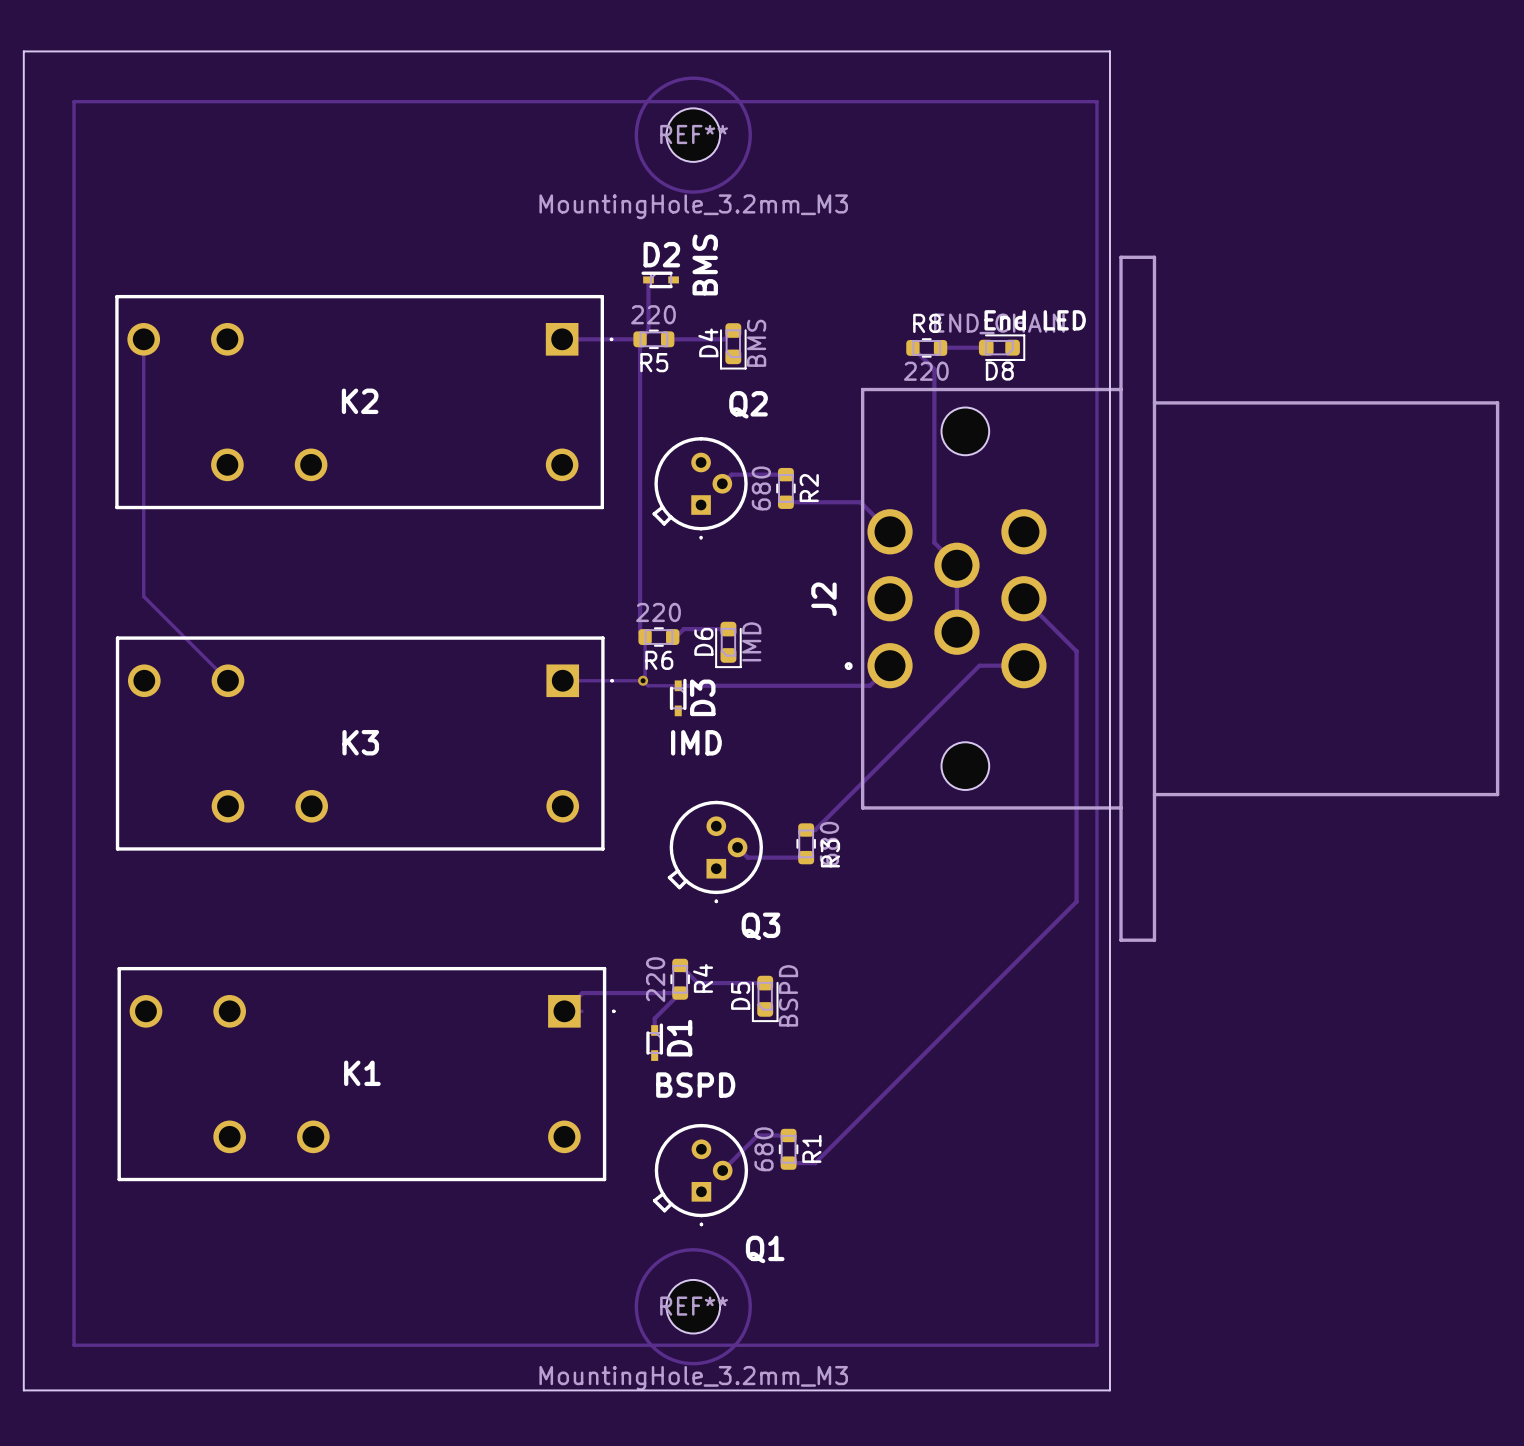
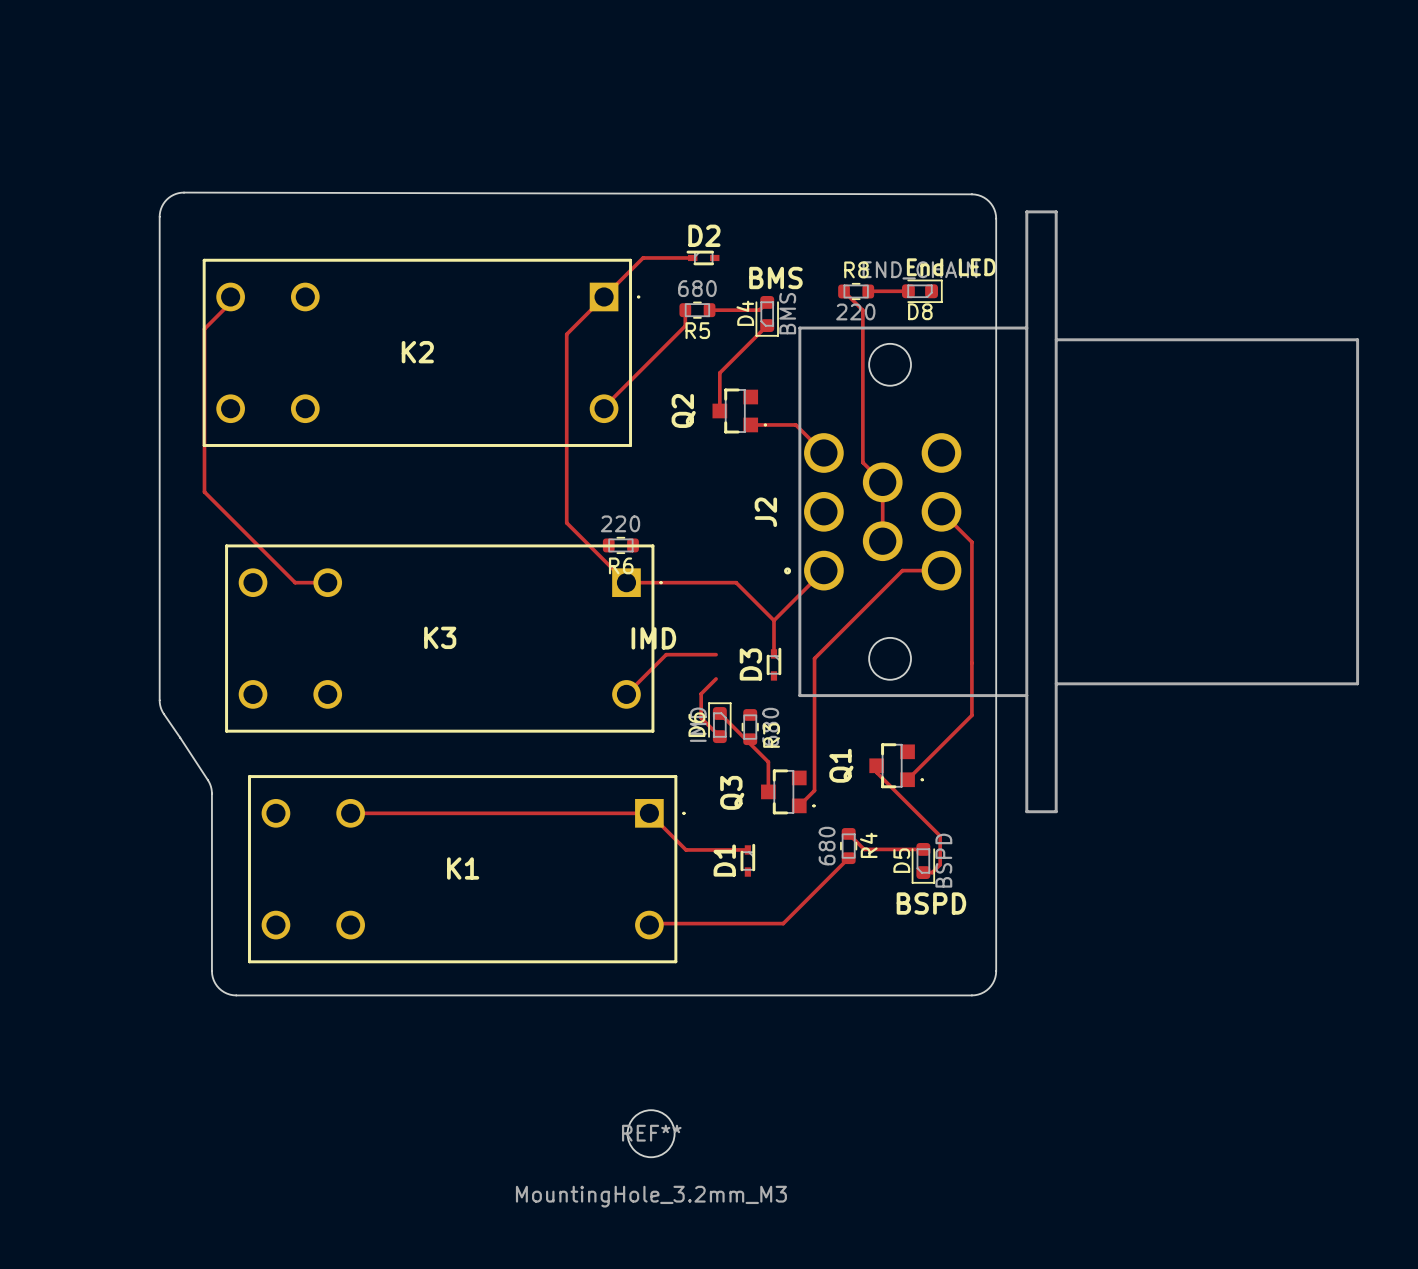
board edge: (23, 51) (1109, 51) (1109, 1390) (23, 1390) (23, 51) -> (184, 192) (173, 194) (166, 199) (162, 206) (159, 216) (159, 700) (162, 712) (208, 780) (211, 788) (211, 971) (213, 980) (219, 988) (226, 993) (236, 995) (971, 995) (981, 993) (989, 988) (994, 980) (996, 971) (996, 218) (994, 209) (989, 201) (981, 196) (971, 194) (184, 192)
drawing: [634, 76, 752, 194] -> none
track: (74, 101) (1096, 101) (1096, 1345) (74, 1345) (74, 101) -> none
REF**: MountingHole_3.2mm_M3 (693, 135) -> none
text rotation: 0° (705, 264) -> 90° clockwise (775, 278)
text position: BMS (705, 264) -> BMS (775, 278)
track: (648, 279) (648, 330) (640, 339) -> none
D2 position: (660, 279) -> (702, 257)
K2 footprint: [115, 294, 614, 510] -> [202, 258, 641, 447]
track: none -> (692, 257) (643, 257) (566, 334) (566, 522) (626, 582) (736, 582) (773, 620)
R5 value: 220 (653, 314) -> 680 (697, 288)
track: (733, 330) (724, 339) (667, 339) -> (767, 302) (759, 310) (709, 310)
track: (143, 339) (143, 596) (227, 680) -> none
track: (562, 339) (640, 339) -> none
track: (640, 339) (640, 631) (645, 637) (645, 678) (643, 680) -> none
R5 position: (653, 339) -> (697, 310)
D4 position: (733, 346) -> (767, 316)
track: none -> (236, 296) (204, 329) (204, 491) (295, 582) (332, 582)
track: none -> (685, 310) (685, 326) (604, 407)
track: none -> (767, 325) (719, 372) (719, 410)
Q2 name position: Q2 (748, 404) -> Q2 (683, 410)
Q2 footprint: [652, 437, 748, 540] -> [712, 388, 767, 434]
track: (785, 474) (731, 474) (722, 483) -> none
R2: 680 (785, 488) -> none
track: (785, 502) (860, 502) -> (750, 424) (795, 424) (797, 427)
track: (728, 629) (683, 629) (675, 637) (672, 637) -> none
track: (1058, 633) (1076, 651) (1076, 901) (815, 1163) (788, 1163) -> (971, 542) (971, 715) (907, 779)
K3 footprint: [115, 636, 614, 851] -> [225, 544, 663, 733]
D6 rotation: 0° (728, 644) -> 180° (719, 722)
D6 position: (728, 644) -> (719, 722)
track: (562, 680) (643, 680) -> none
track: (643, 680) (648, 685) (869, 685) -> (773, 620) (806, 588)
via: (643, 680) -> none
D3 position: (678, 697) -> (773, 664)
D3 name position: D3 (702, 697) -> D3 (750, 664)
track: none -> (773, 620) (773, 653)
track: none -> (716, 654) (666, 654) (626, 694)
track: (879, 765) (815, 830) (806, 830) -> (814, 658) (814, 790) (799, 805)
track: none -> (716, 678) (701, 693) (701, 717) (719, 736)
Q3 footprint: [667, 800, 763, 904] -> [761, 769, 816, 815]
track: none -> (719, 713) (768, 762) (768, 791)
track: (737, 847) (747, 857) (806, 857) -> none
track: none -> (876, 765) (876, 772) (940, 836) (940, 864) (932, 872) (923, 872)
Q3 name position: Q3 (760, 926) -> Q3 (732, 792)
track: none -> (355, 813) (649, 813) (686, 849) (747, 849)
track: (680, 965) (697, 983) (765, 983) -> (848, 833) (864, 849) (923, 849)
K1 footprint: [117, 966, 616, 1182] -> [248, 775, 686, 964]
R4 value: 220 (655, 979) -> 680 (827, 846)
R4 position: (680, 979) -> (848, 846)
track: none -> (848, 858) (783, 923) (649, 923)
D5 position: (765, 998) -> (923, 863)
track: (581, 1011) (564, 1011) (582, 993) (680, 993) (654, 1018) (654, 1030) -> none
D1 name position: D1 (679, 1038) -> D1 (724, 860)
D1 position: (654, 1042) -> (747, 860)
text position: BSPD (695, 1085) -> BSPD (931, 903)
Q1 footprint: [652, 1123, 749, 1227] -> [869, 743, 924, 789]
track: (788, 1135) (757, 1135) (722, 1170) -> none
R1: 680 (788, 1149) -> none
drawing: [634, 1248, 752, 1366] -> none
Q1 name position: Q1 (765, 1249) -> Q1 (841, 765)

